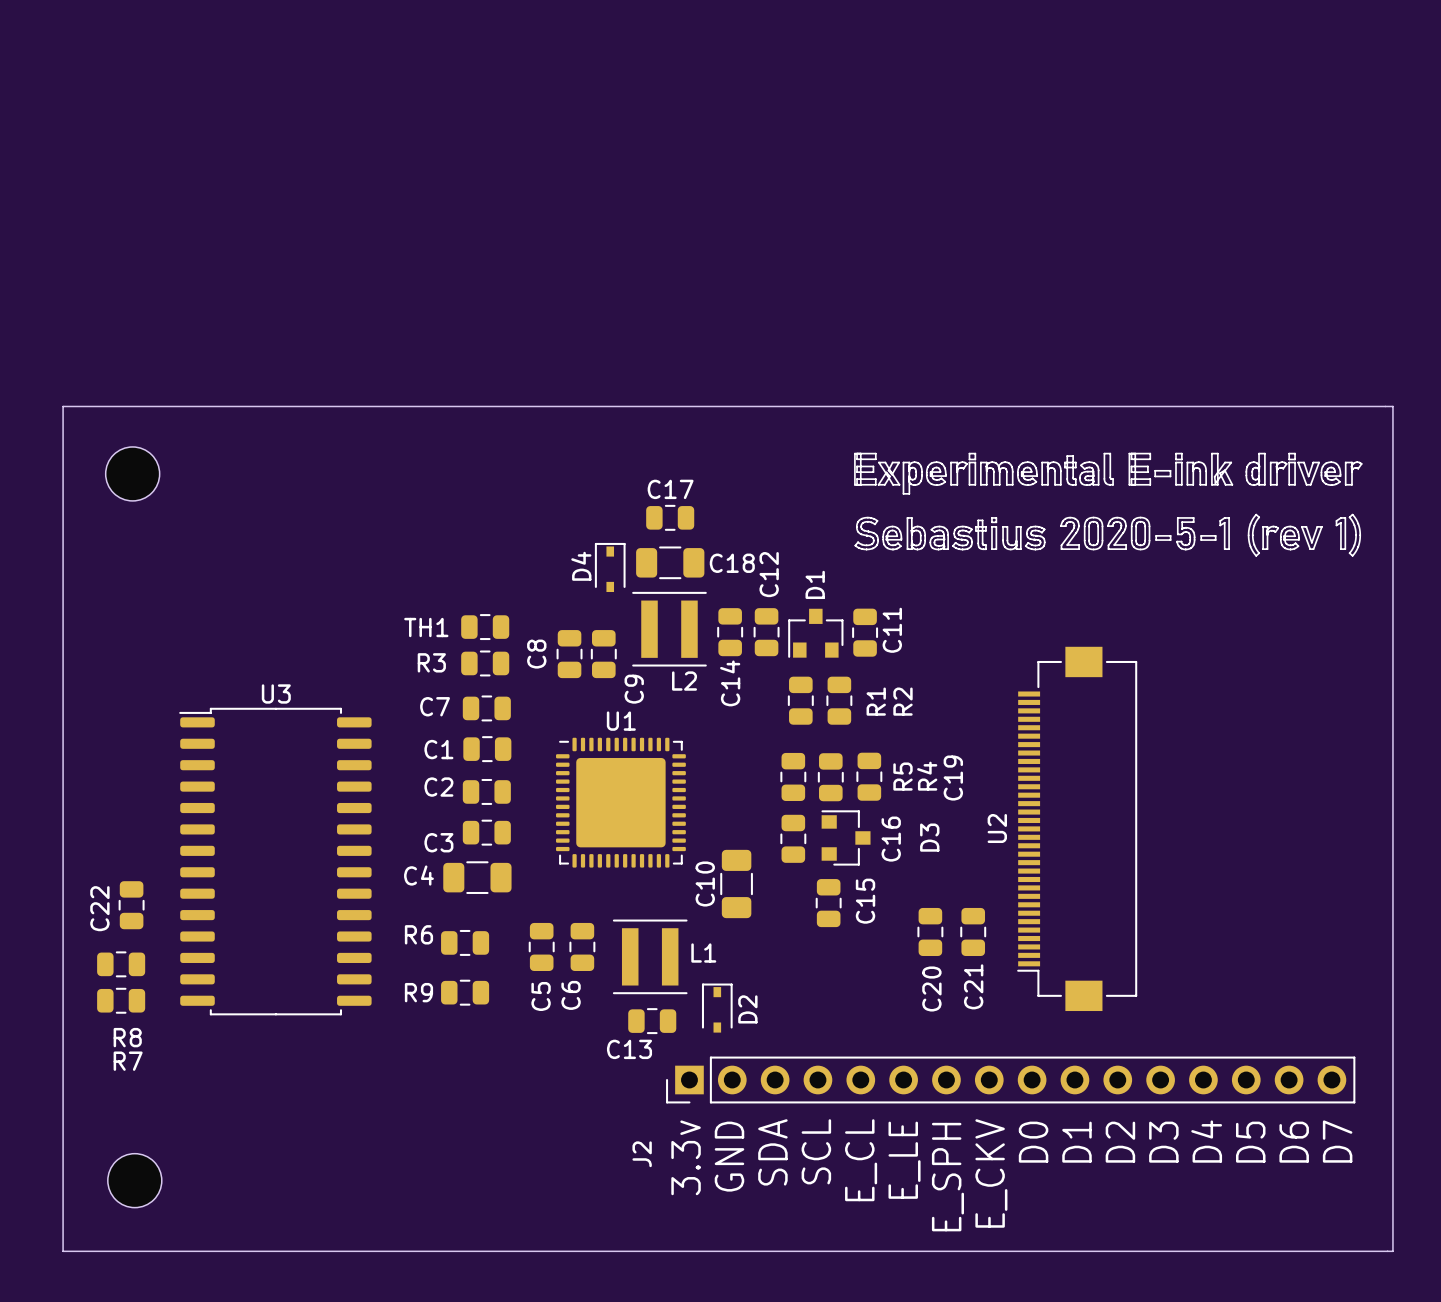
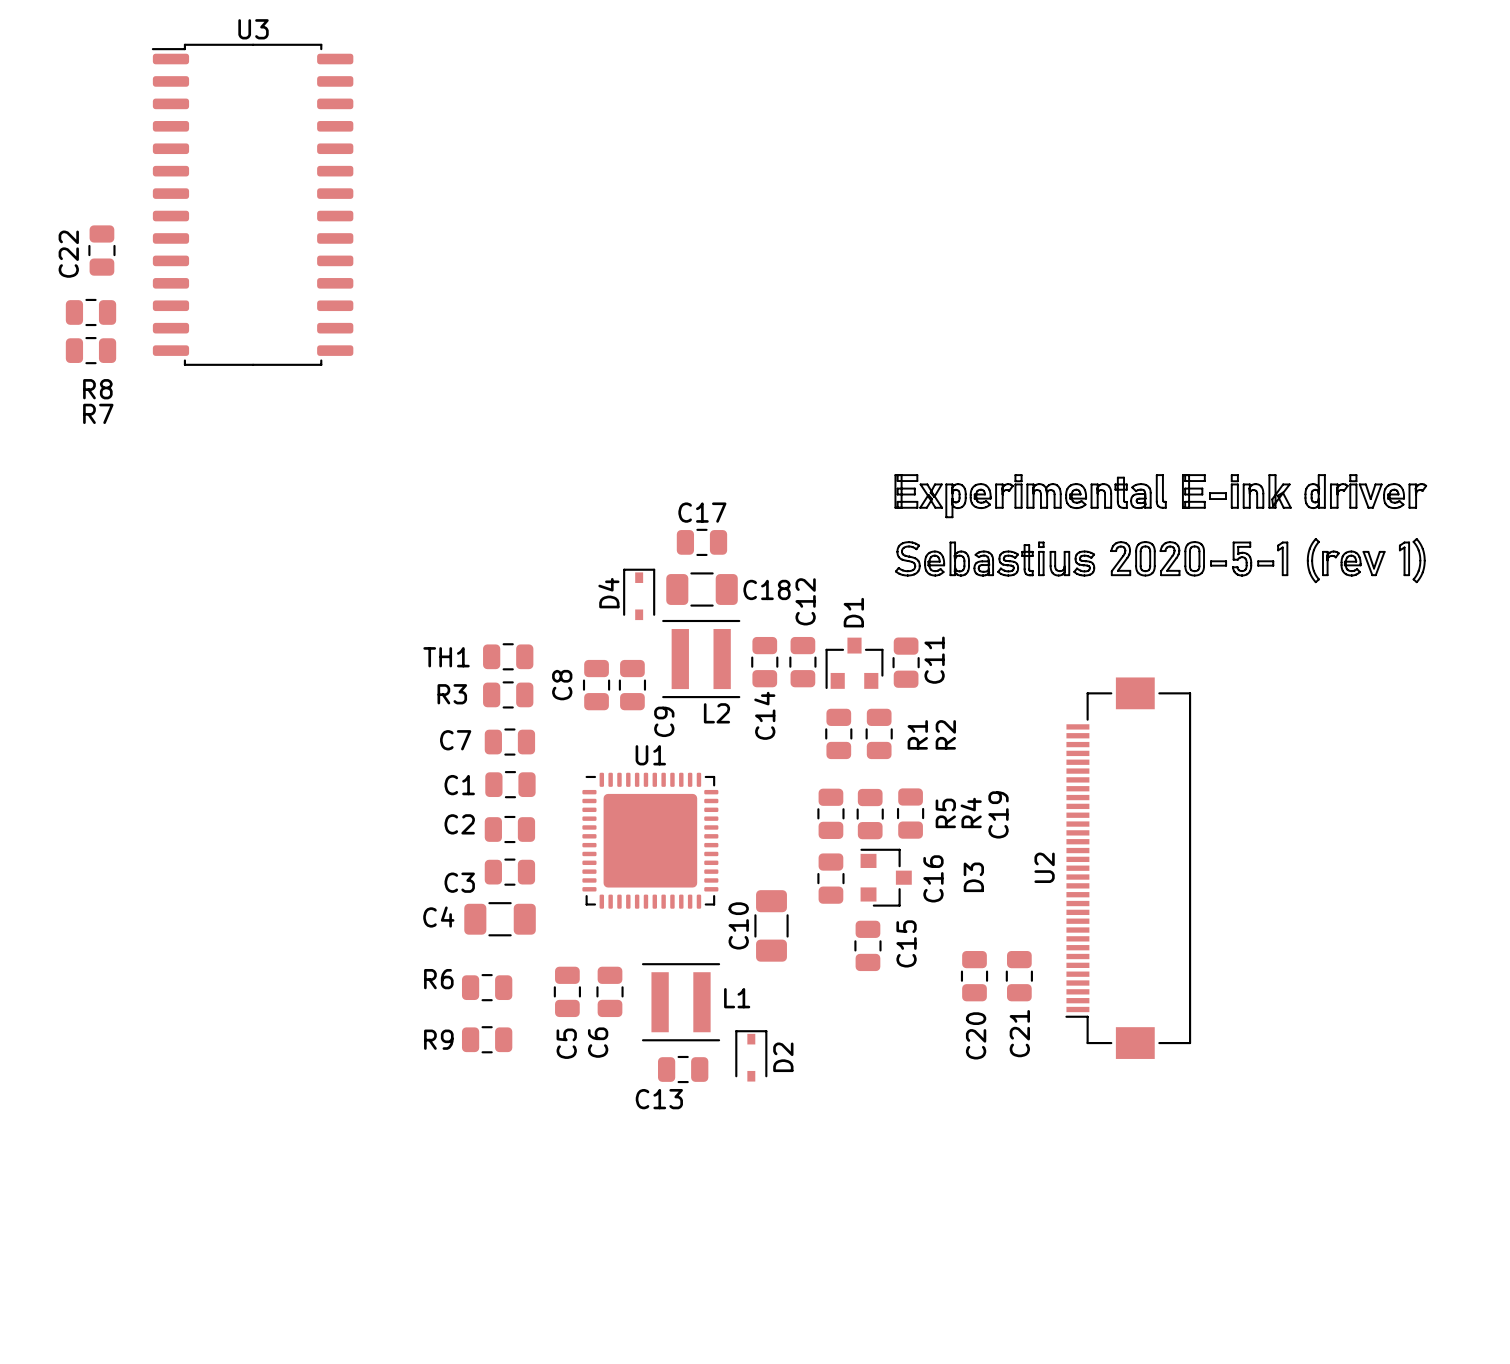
board edge: (63, 406) (1392, 406) (1392, 1251) (63, 1251) (63, 406) -> none
part: (132, 473) -> none
U3 position: (275, 861) -> (252, 204)
C22 position: (131, 905) -> (101, 250)
R8 position: (121, 964) -> (90, 312)
R7 position: (121, 1000) -> (90, 350)
J2: (1010, 1080) -> none
text: D4 (1206, 1141) -> none
text: D7 (1337, 1141) -> none
text: D0 (1033, 1142) -> none
text: D1 (1076, 1142) -> none
text: D2 (1120, 1142) -> none
text: D3 (1163, 1142) -> none
text: D5 (1250, 1142) -> none
text: D6 (1294, 1142) -> none
text: SCL (816, 1151) -> none
text: SDA (772, 1152) -> none
text: GND (729, 1156) -> none
text: 3.3v (686, 1157) -> none
text: E_CL (861, 1160) -> none
text: E_LE (904, 1160) -> none
text: E_CKV (991, 1173) -> none
text: E_SPH (947, 1177) -> none
part: (134, 1180) -> none

